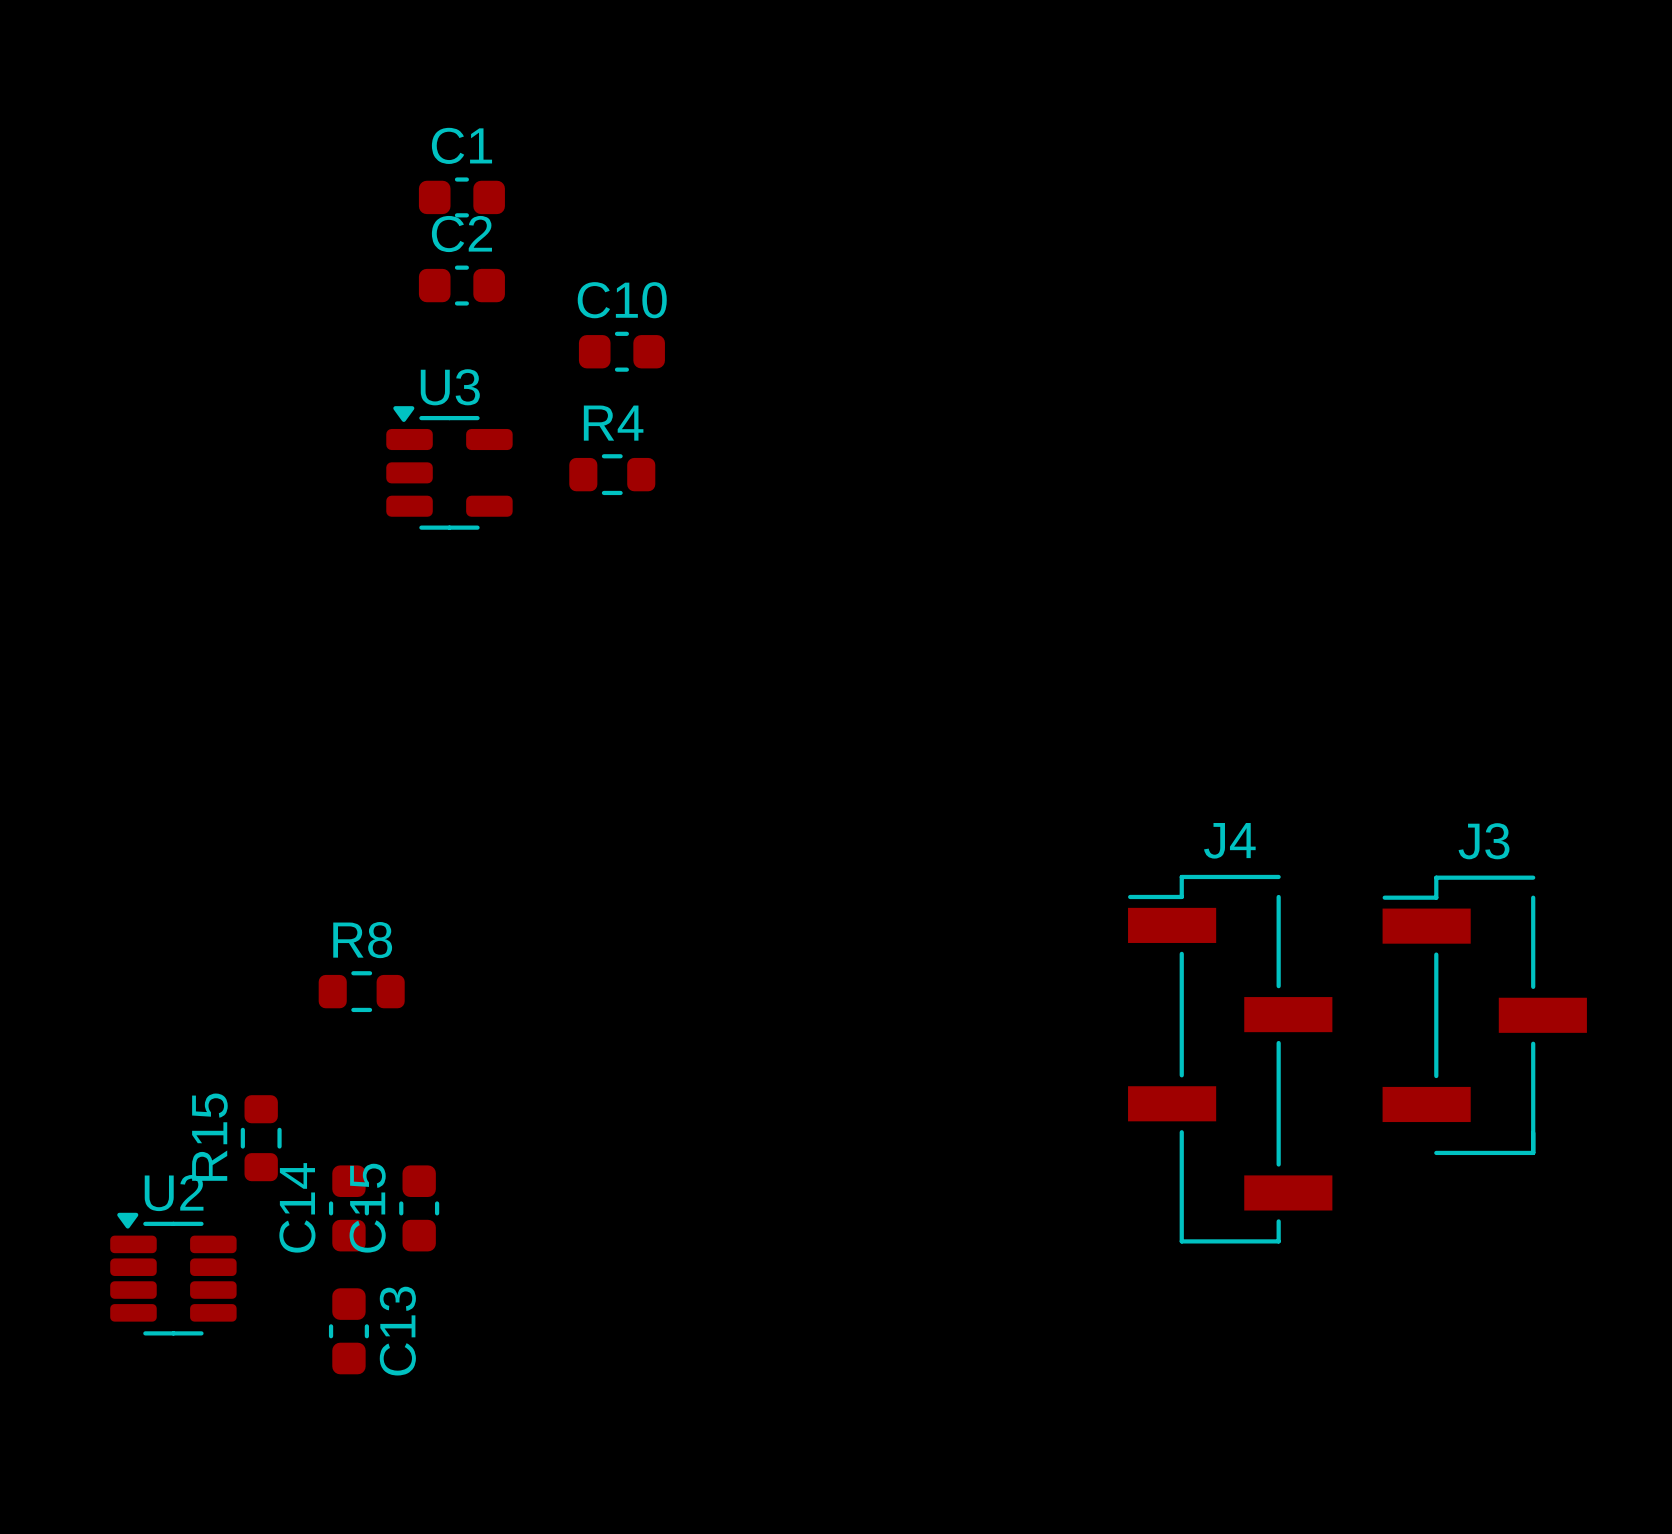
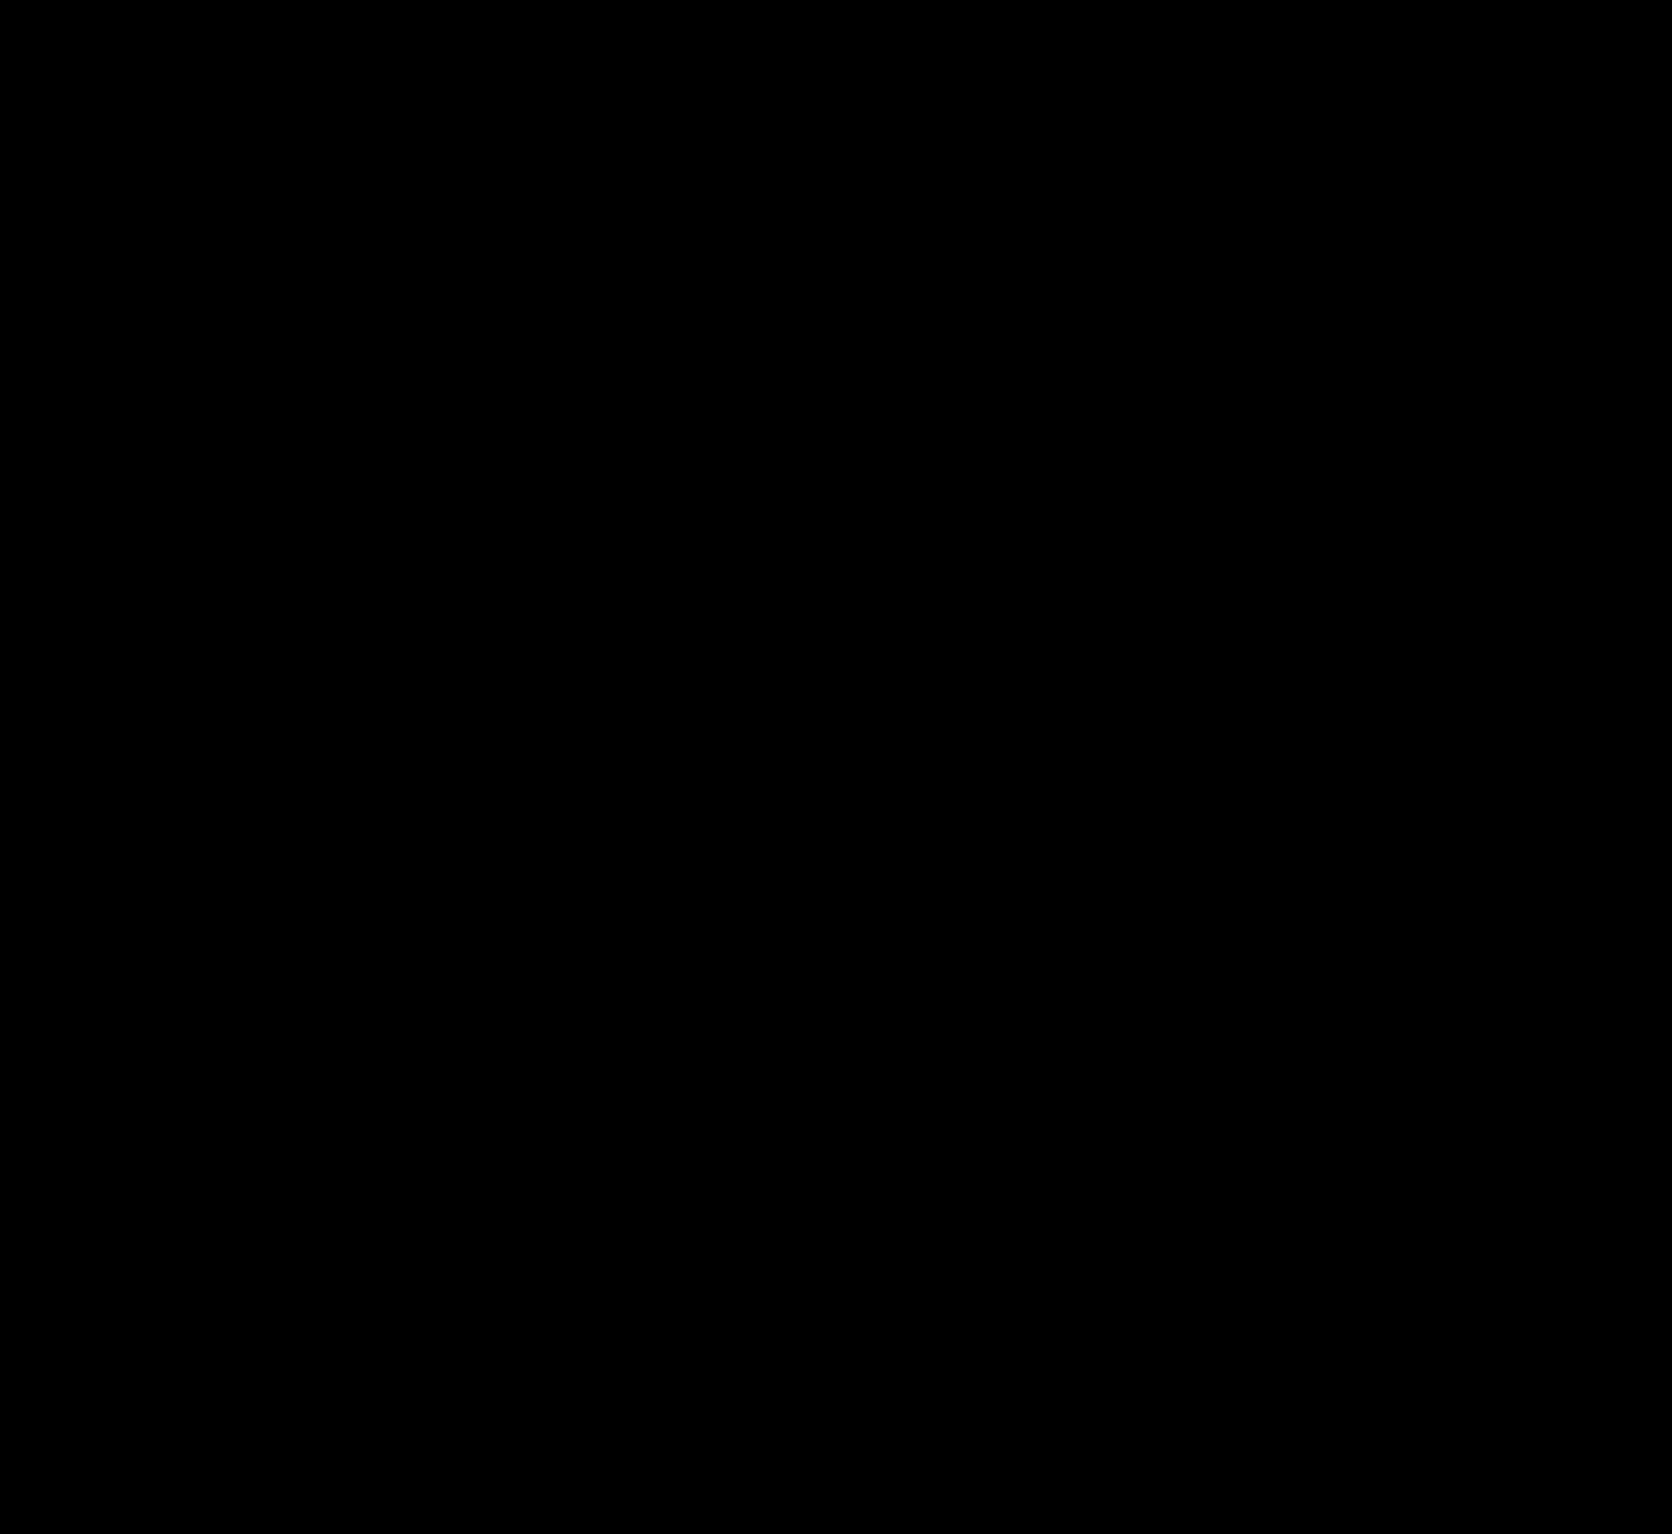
C1: (461, 197) -> none
C2: (461, 285) -> none
C10: (621, 351) -> none
U3: (449, 467) -> none
R4: (612, 474) -> none
R8: (361, 991) -> none
J3: (1484, 1015) -> none
J4: (1230, 1059) -> none
R15: (261, 1138) -> none
C14: (348, 1208) -> none
C15: (419, 1208) -> none
U2: (173, 1274) -> none
C13: (348, 1331) -> none

